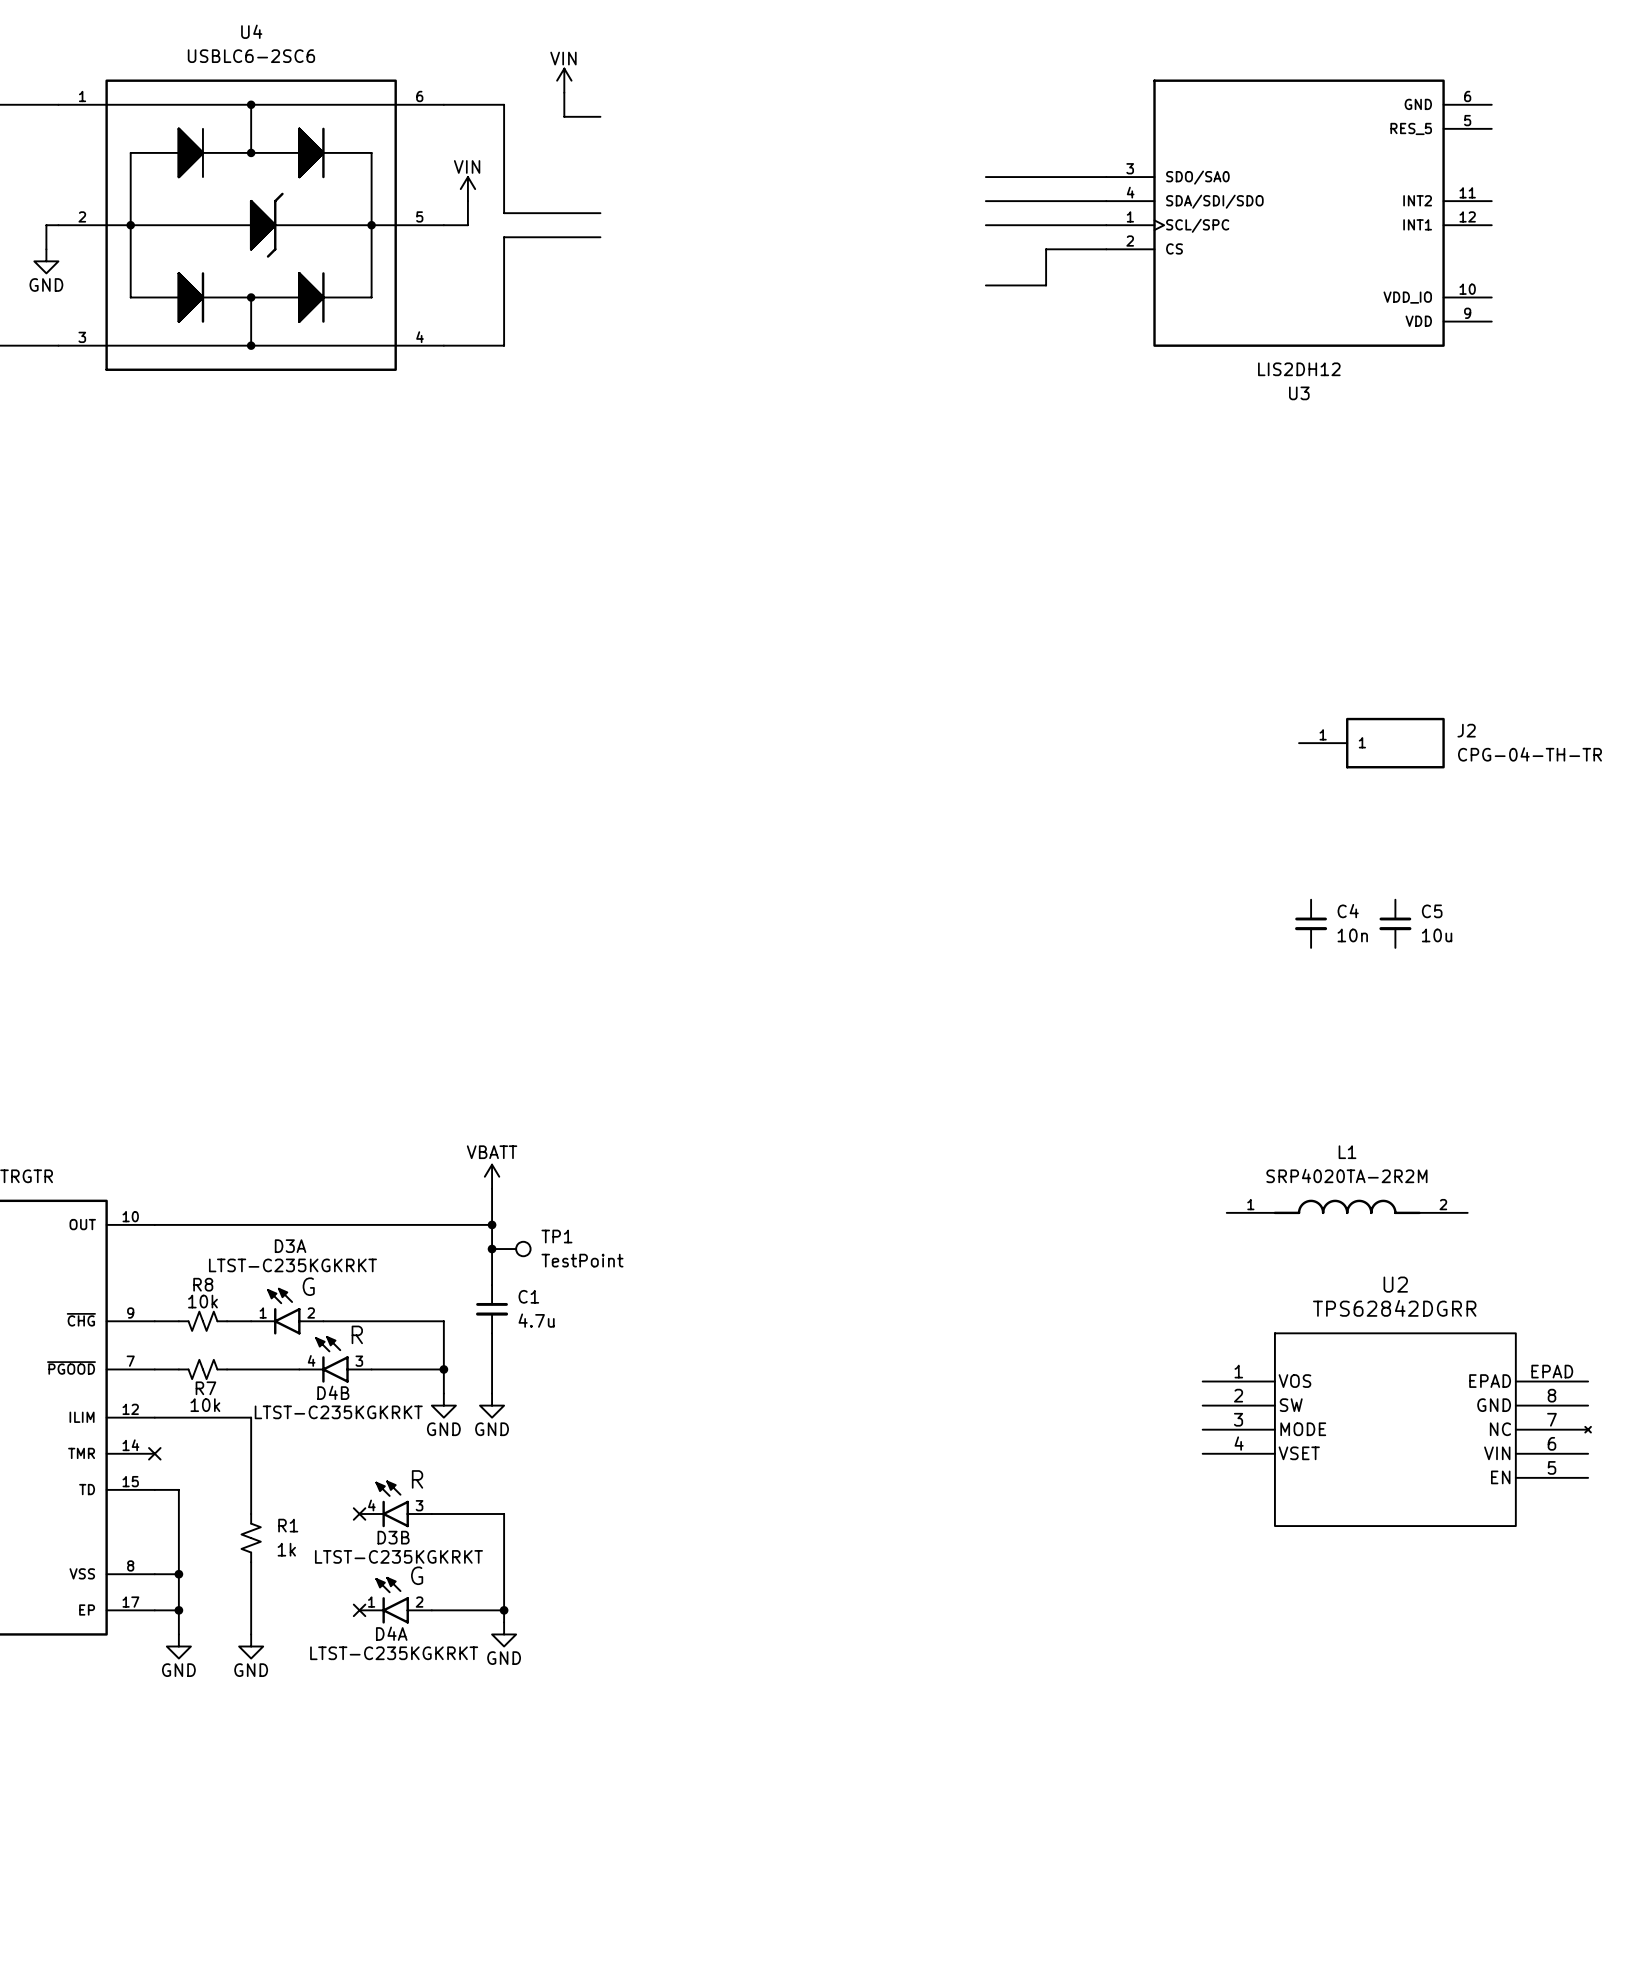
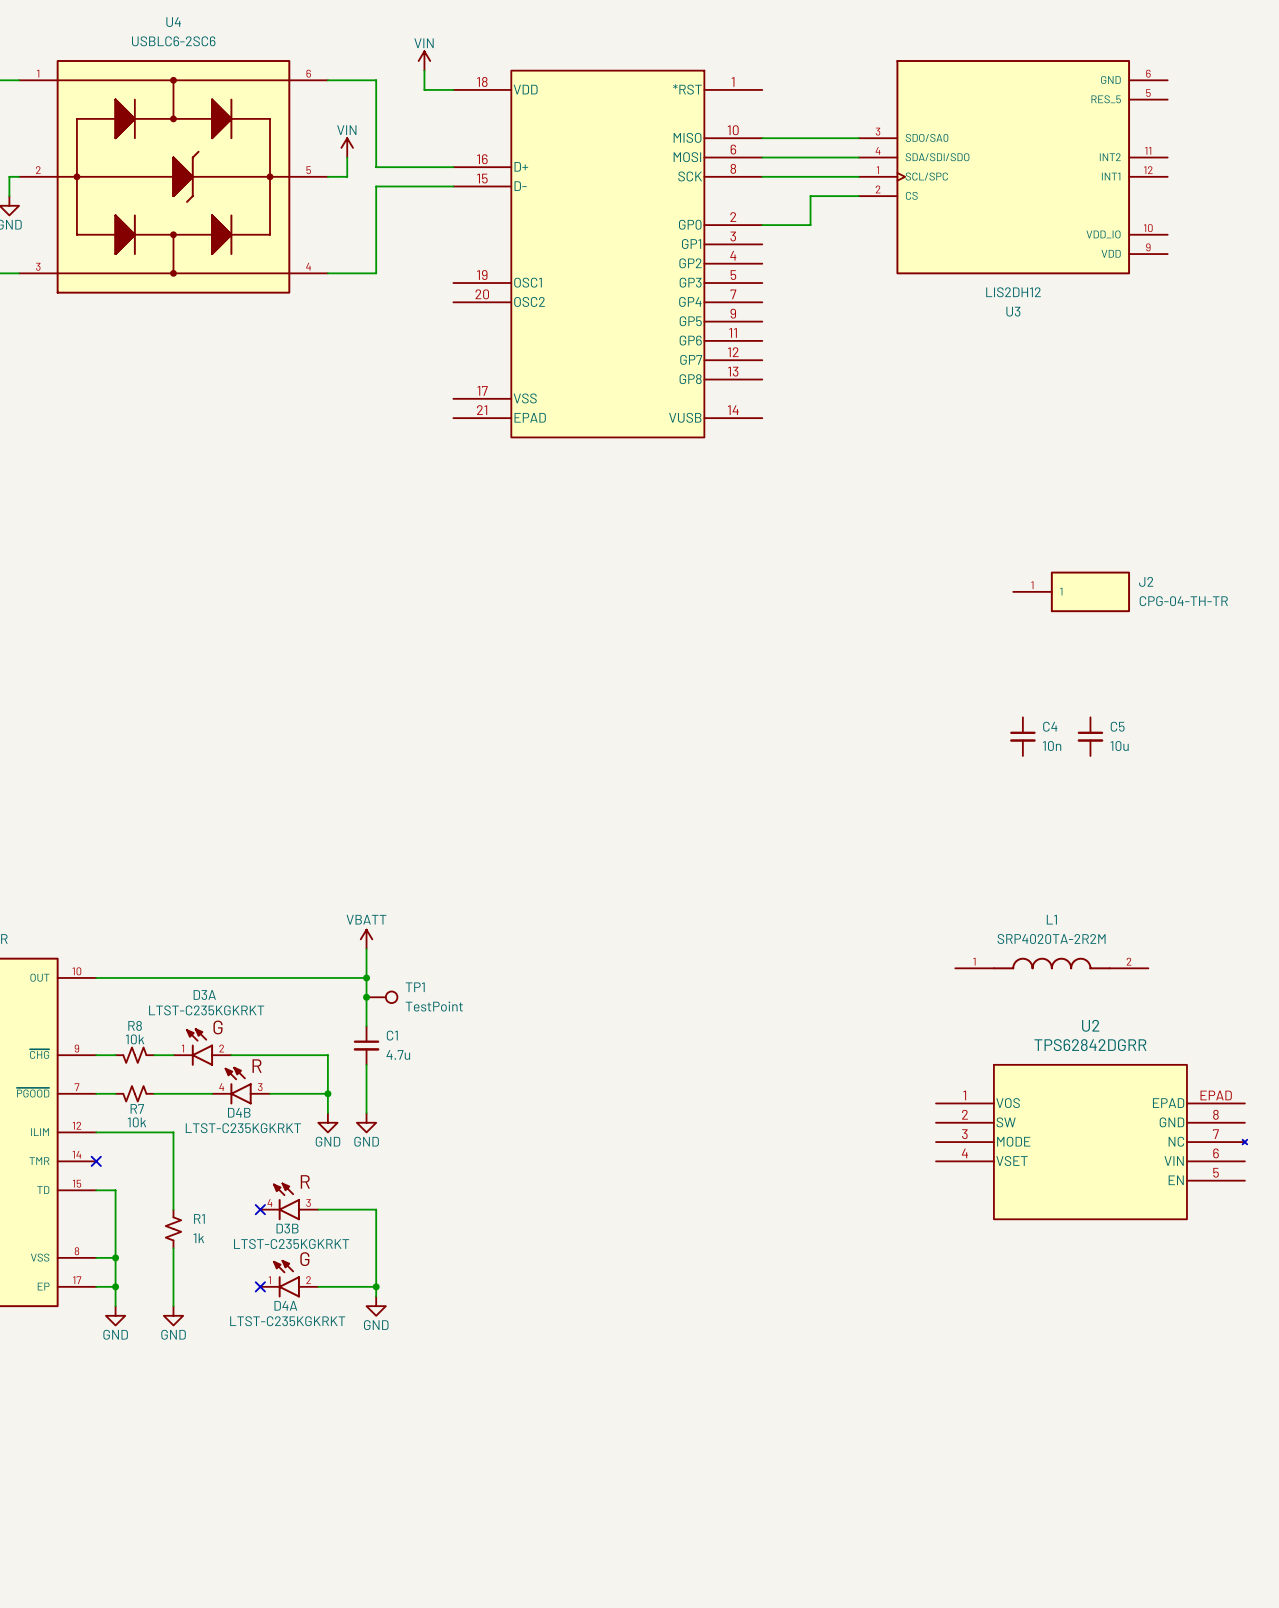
part: none -> (607, 254)

